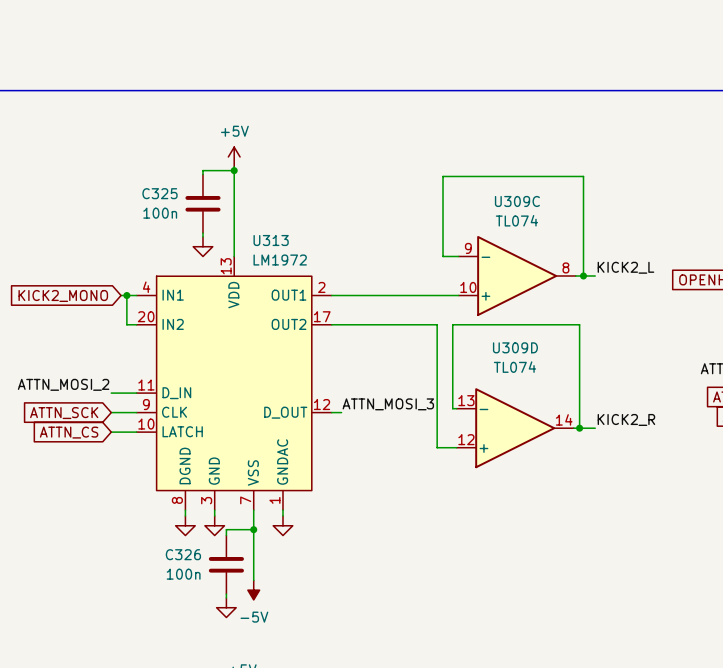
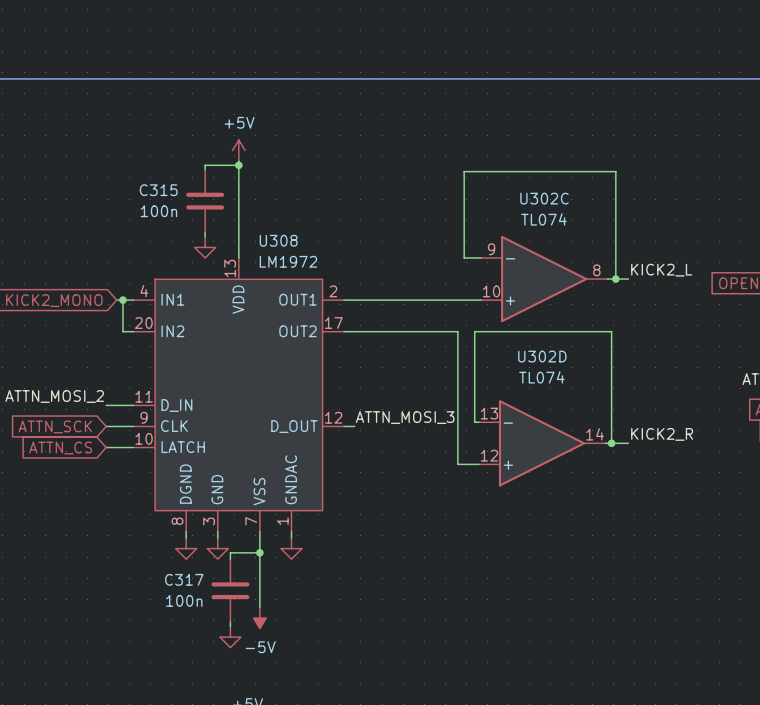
C325 name: C325 (159, 193) -> C315 (158, 190)
U309C name: U309C (517, 201) -> U302C (544, 198)
U313 name: U313 (271, 240) -> U308 (278, 240)
U309D name: U309D (515, 347) -> U302D (542, 356)
C326 name: C326 (183, 554) -> C317 (184, 579)

